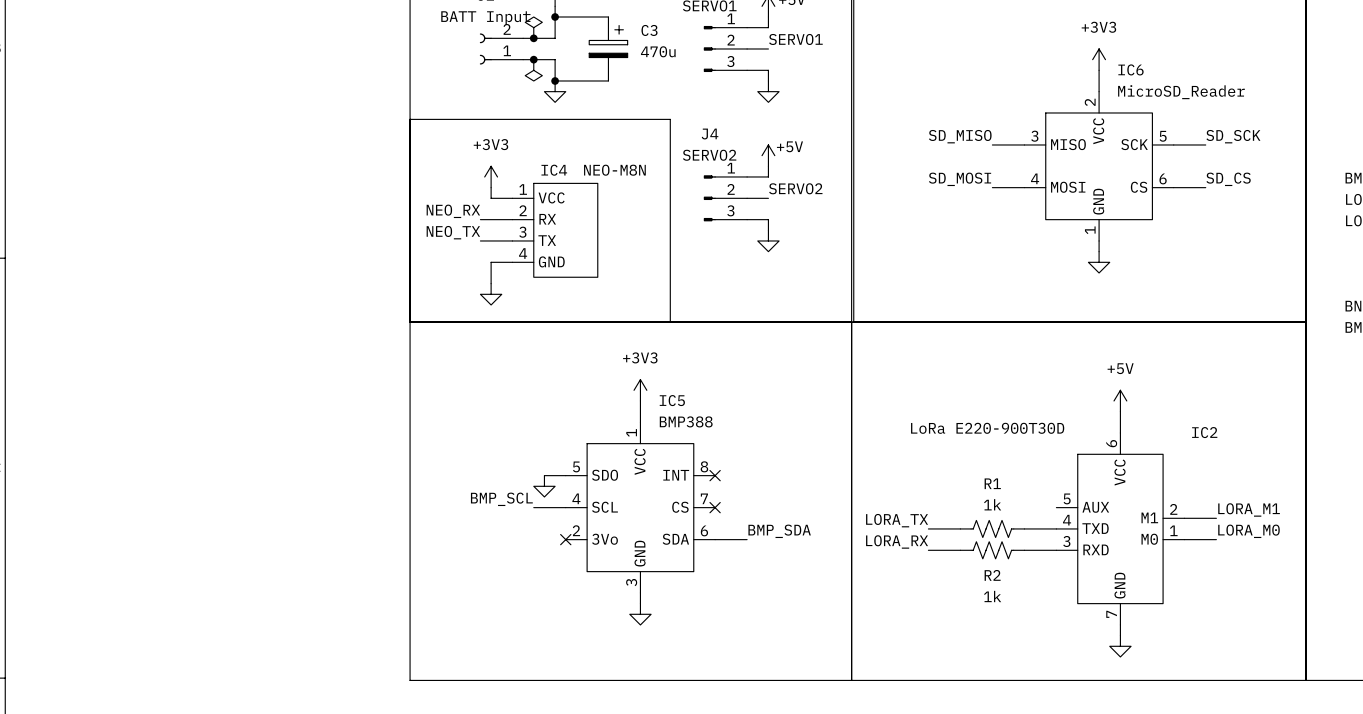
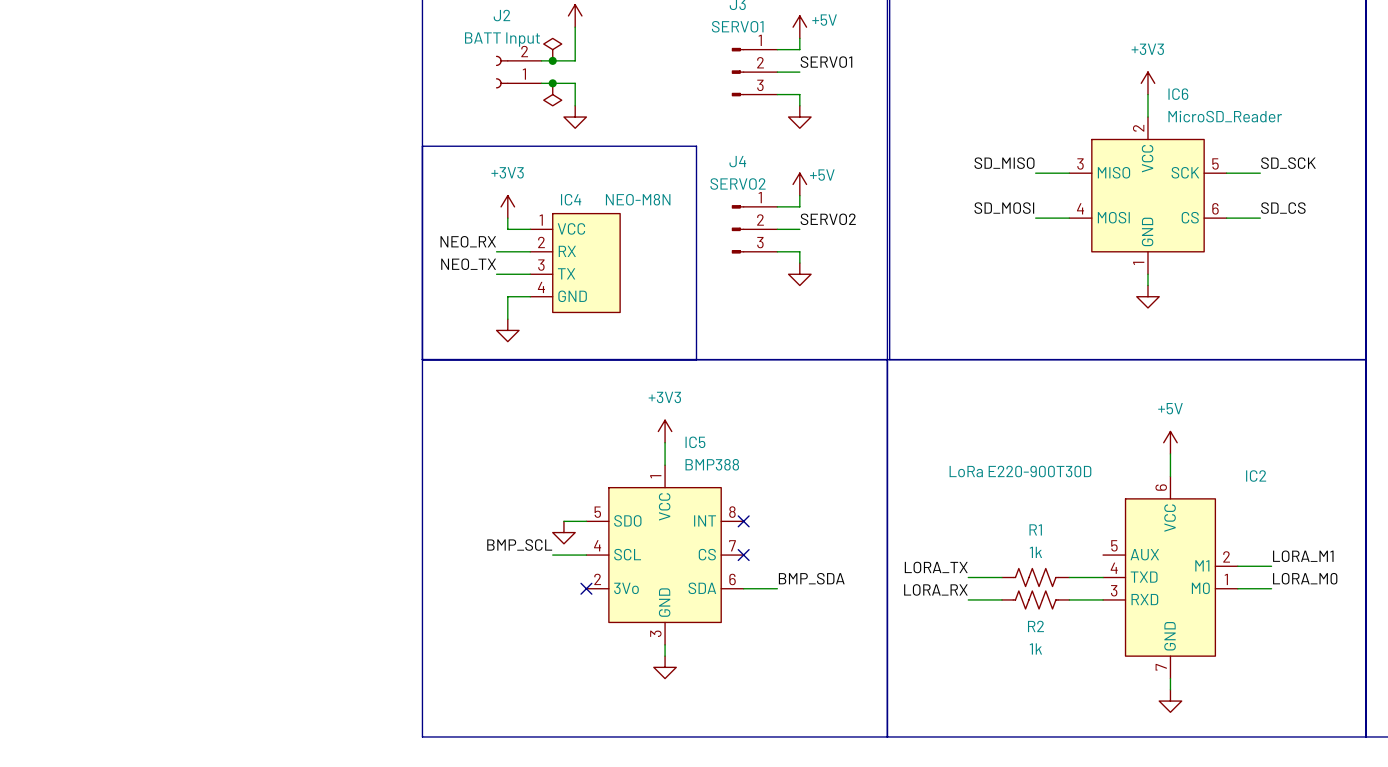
wire: (555, 16) (608, 16) -> none
junction: (555, 16) -> none
C3: 470u (608, 48) -> none
wire: (555, 80) (608, 80) -> none
junction: (555, 80) -> none

